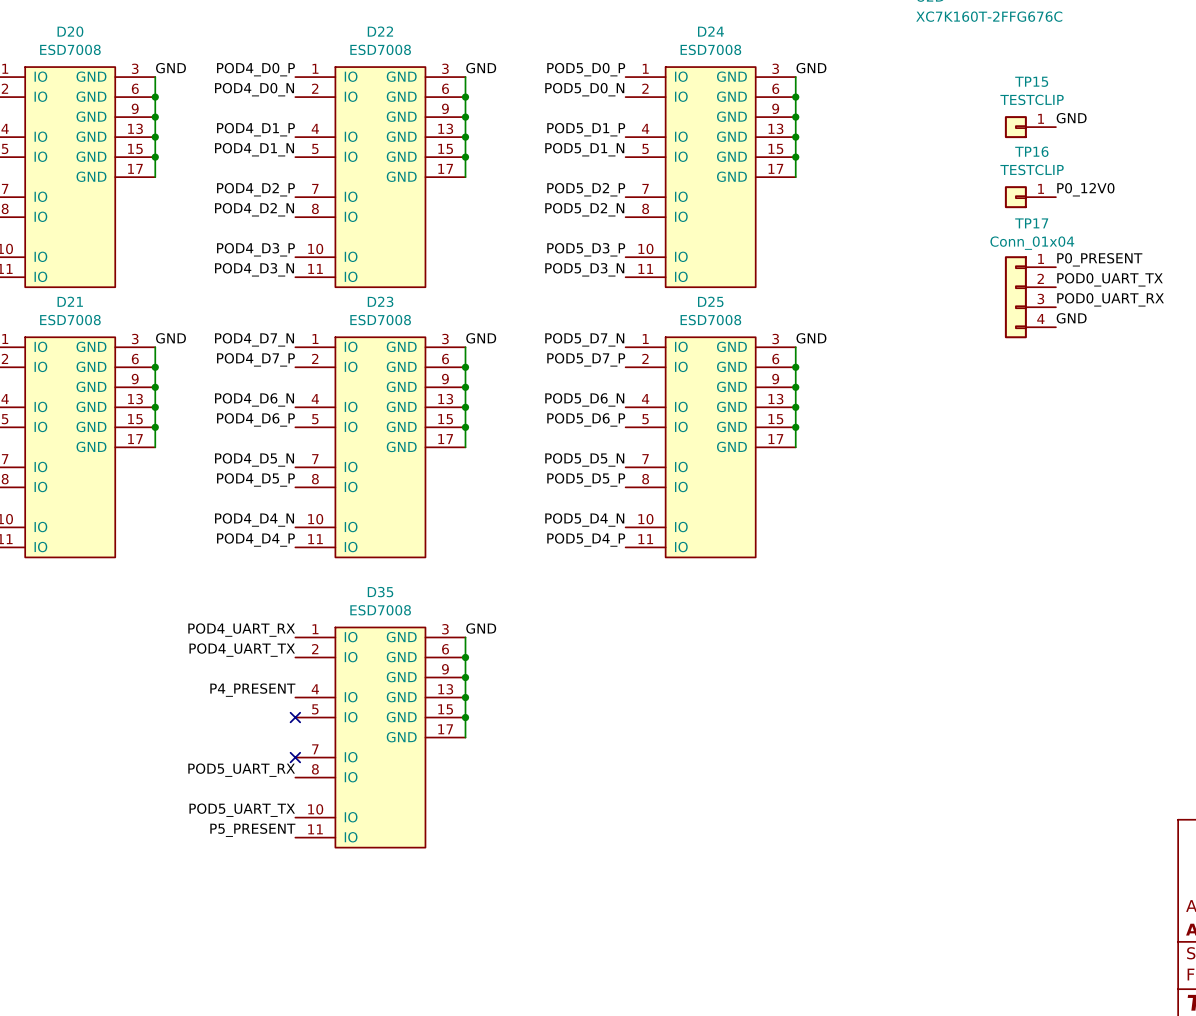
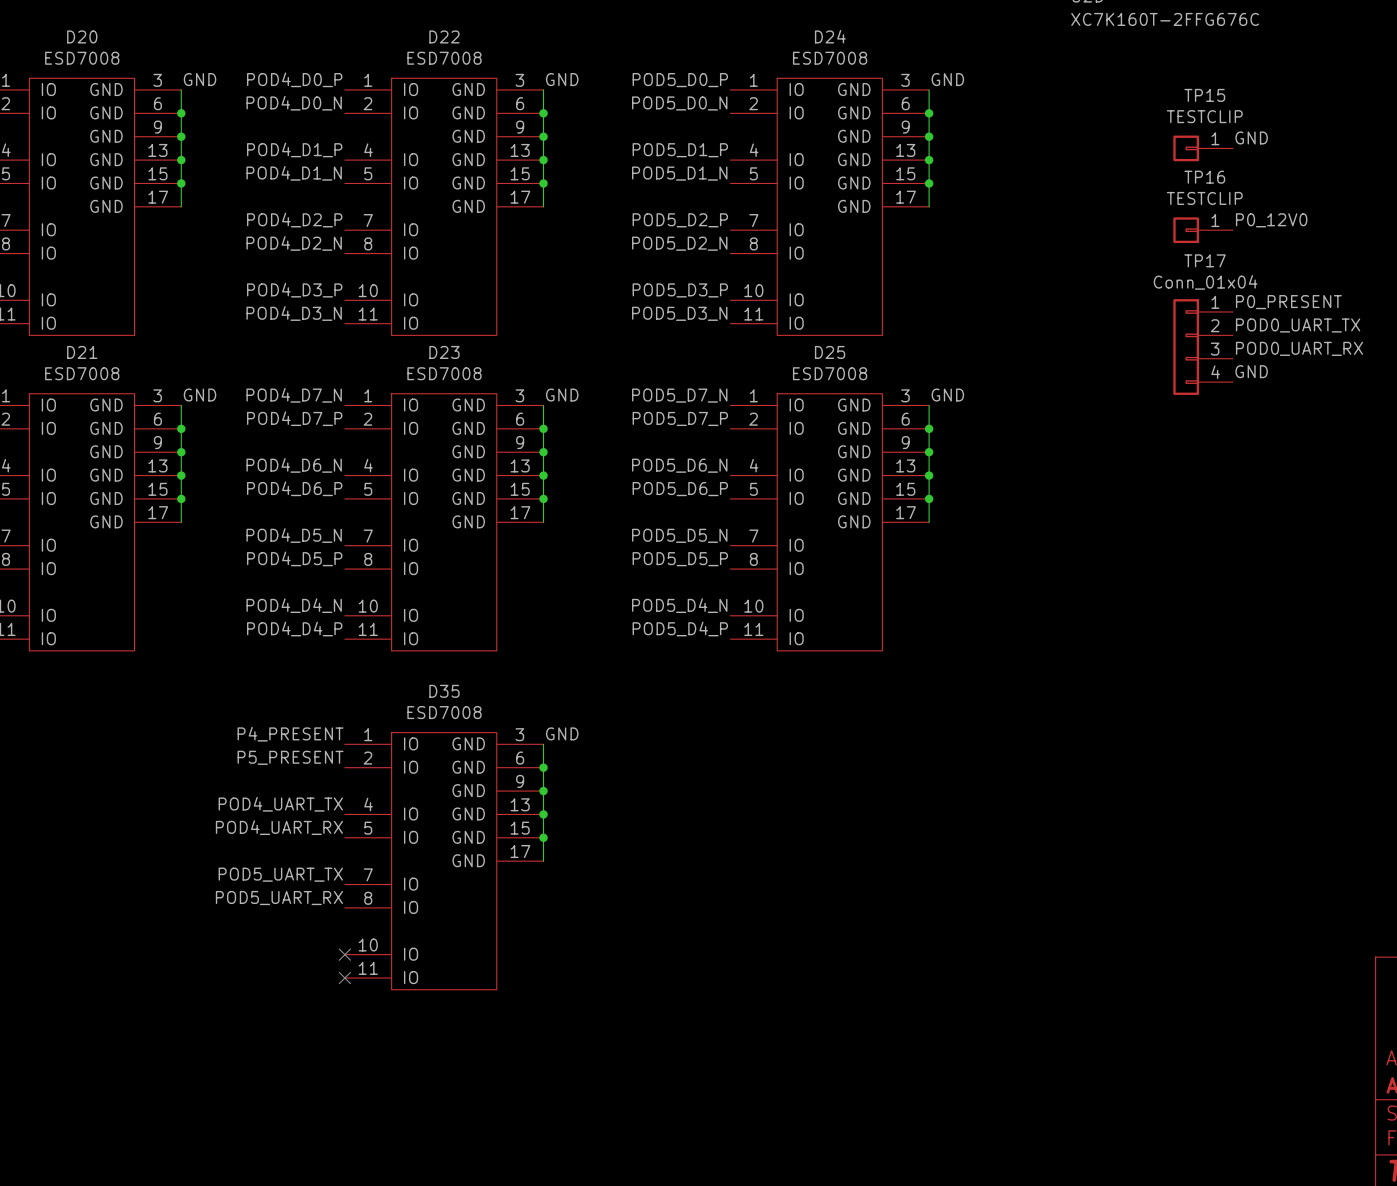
label: POD4_UART_RX (241, 630) -> P4_PRESENT (290, 734)
label: POD4_UART_TX (242, 650) -> P5_PRESENT (290, 757)
label: P4_PRESENT (252, 690) -> POD4_UART_TX (280, 804)
label: none -> POD4_UART_RX (279, 827)
no-connect mark: (295, 717) -> none
no-connect mark: (295, 757) -> none
label position: POD5_UART_TX (242, 810) -> POD5_UART_TX (280, 874)
no-connect mark: none -> (344, 954)
label: P5_PRESENT (252, 830) -> none
no-connect mark: none -> (344, 978)

